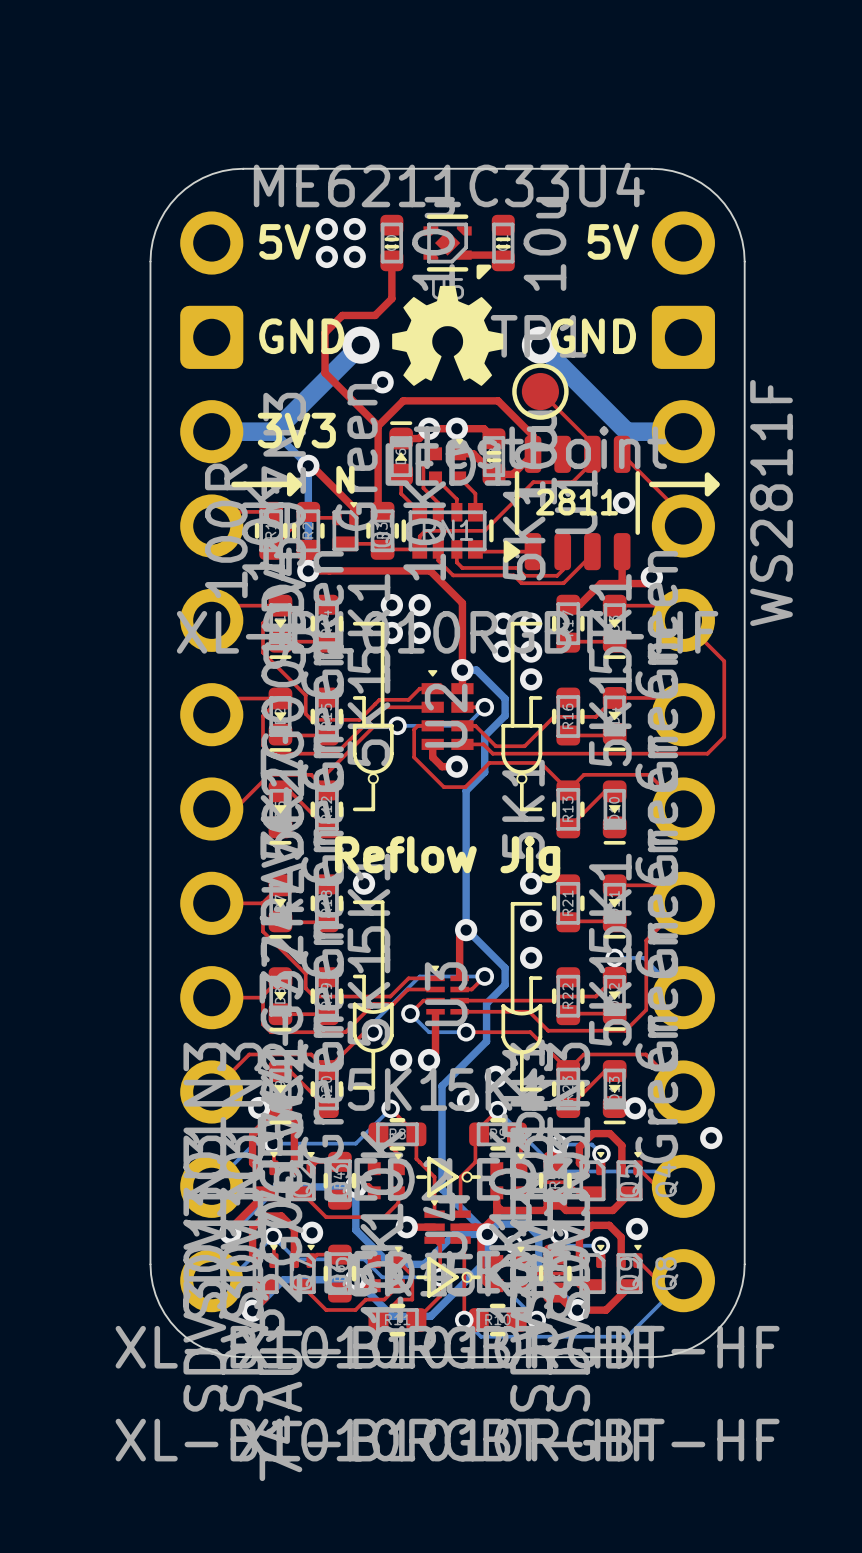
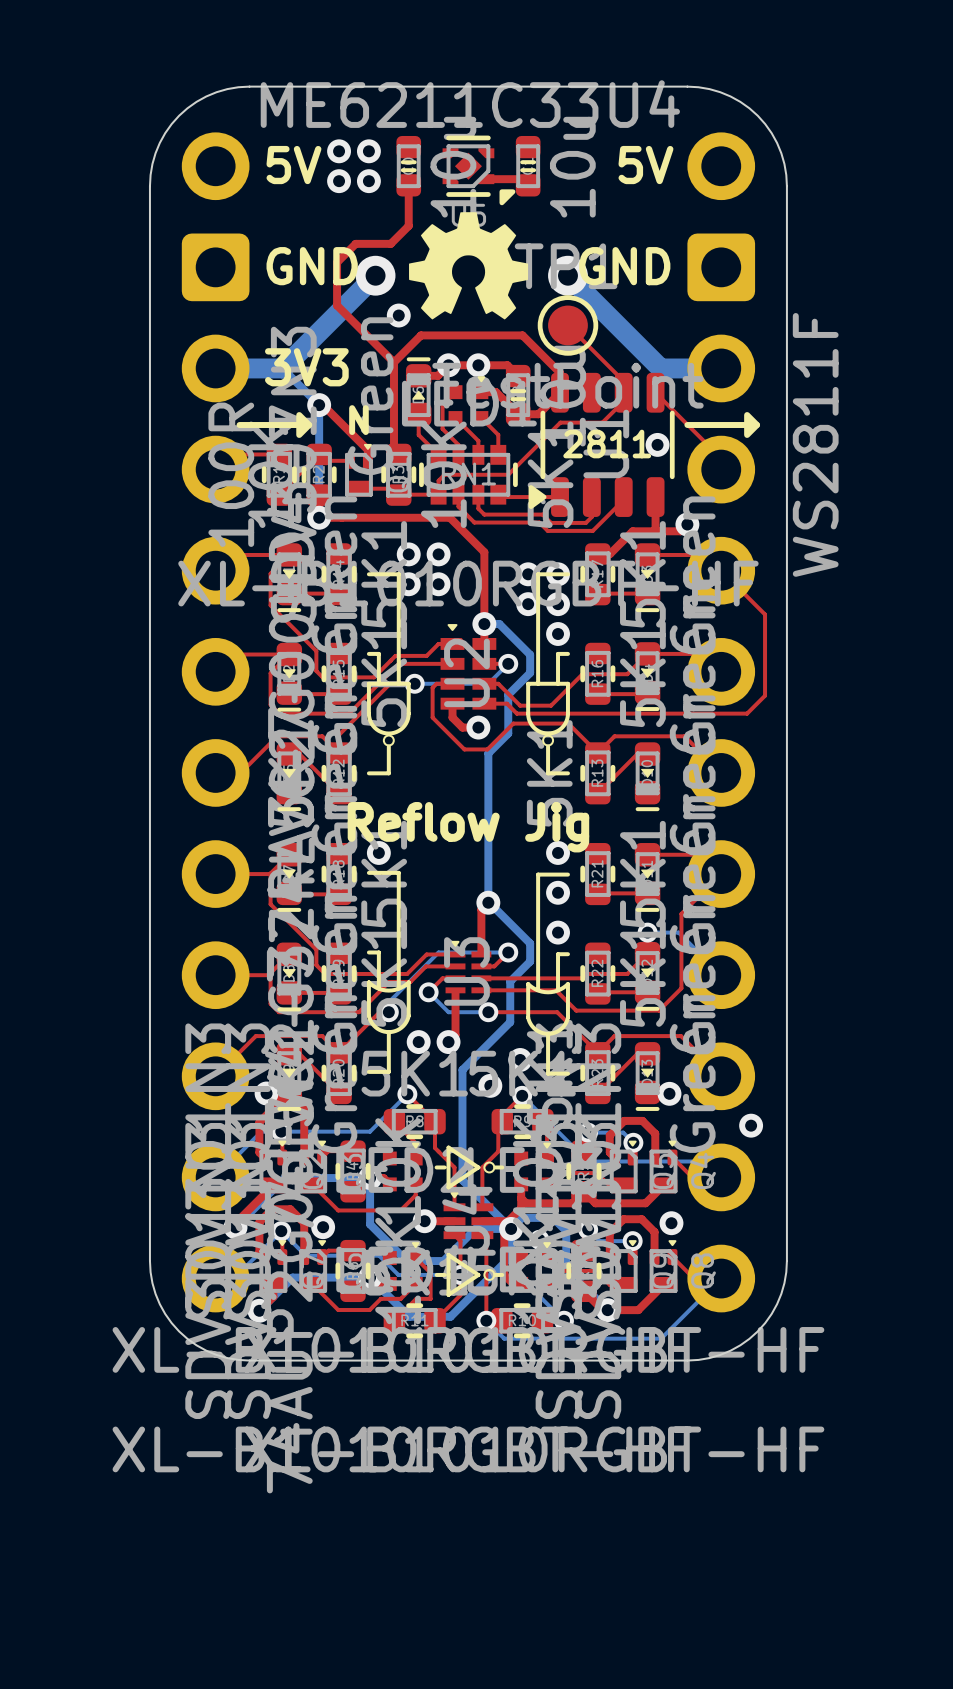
part footprint: [490, 1246, 530, 1293] -> [512, 1242, 557, 1293]

